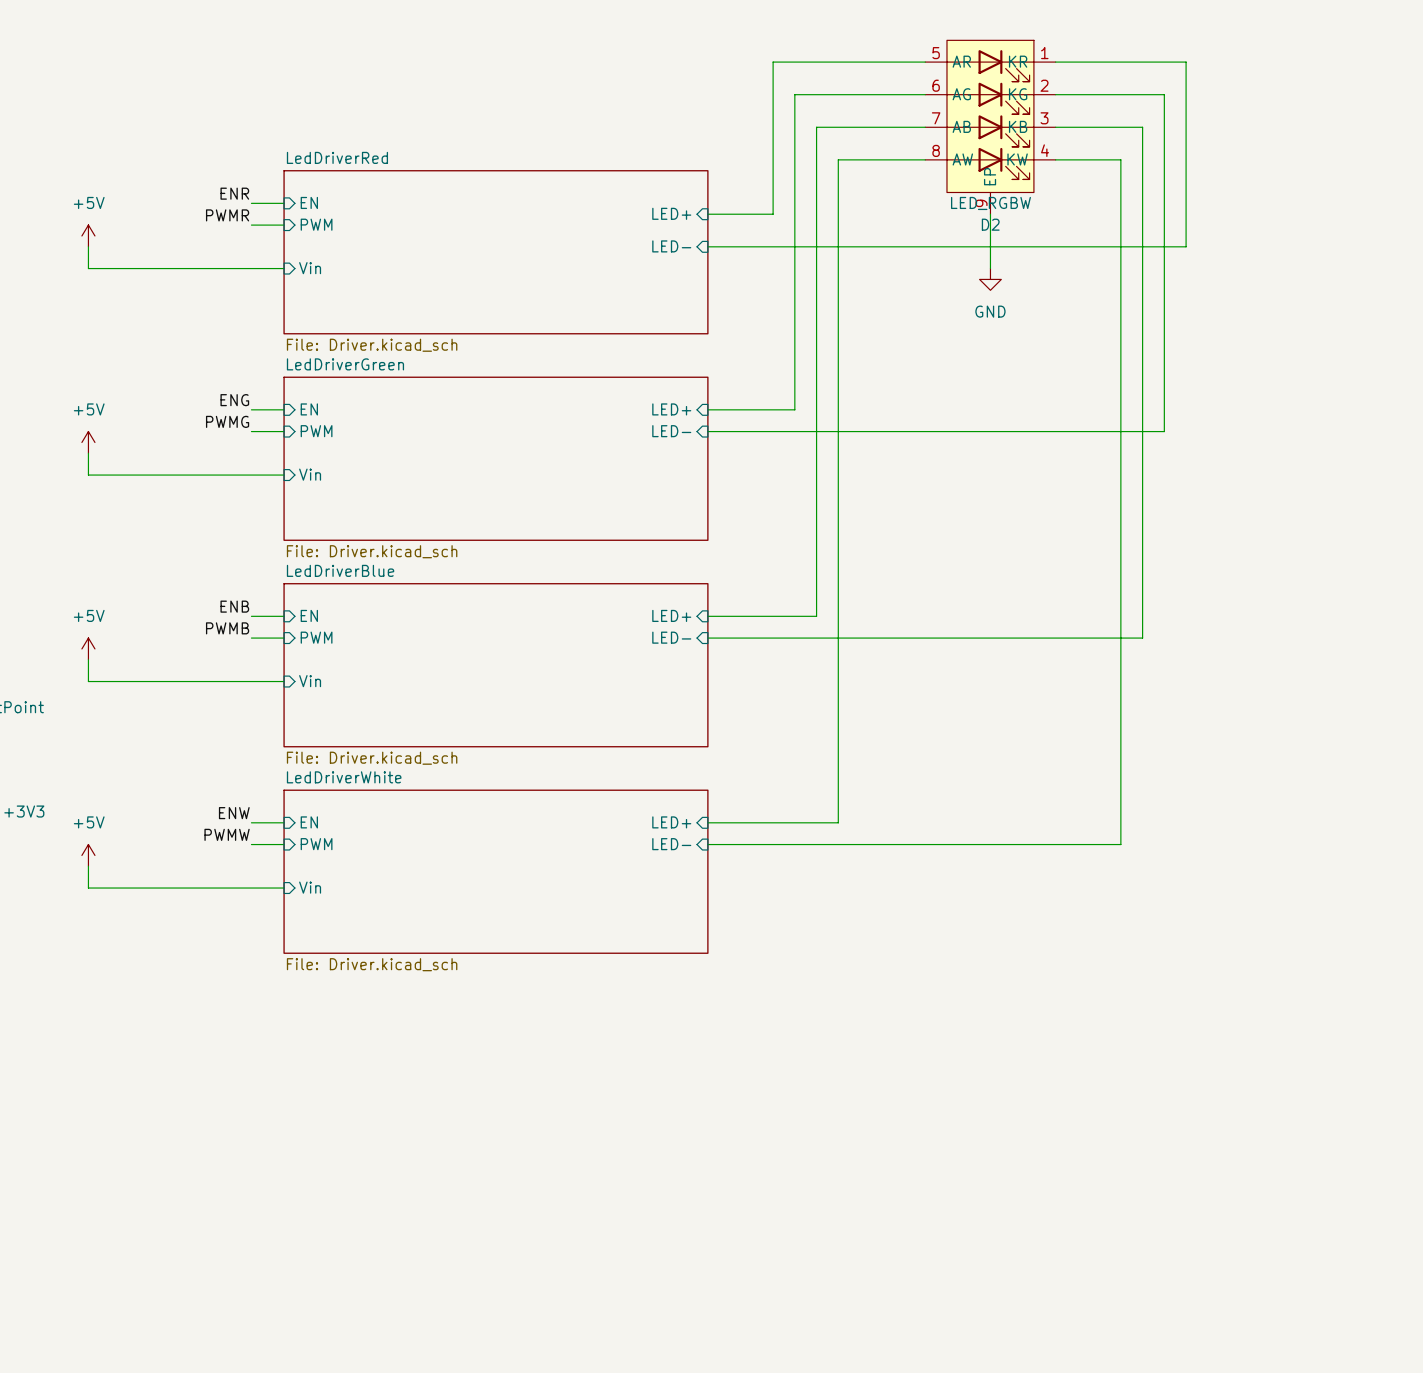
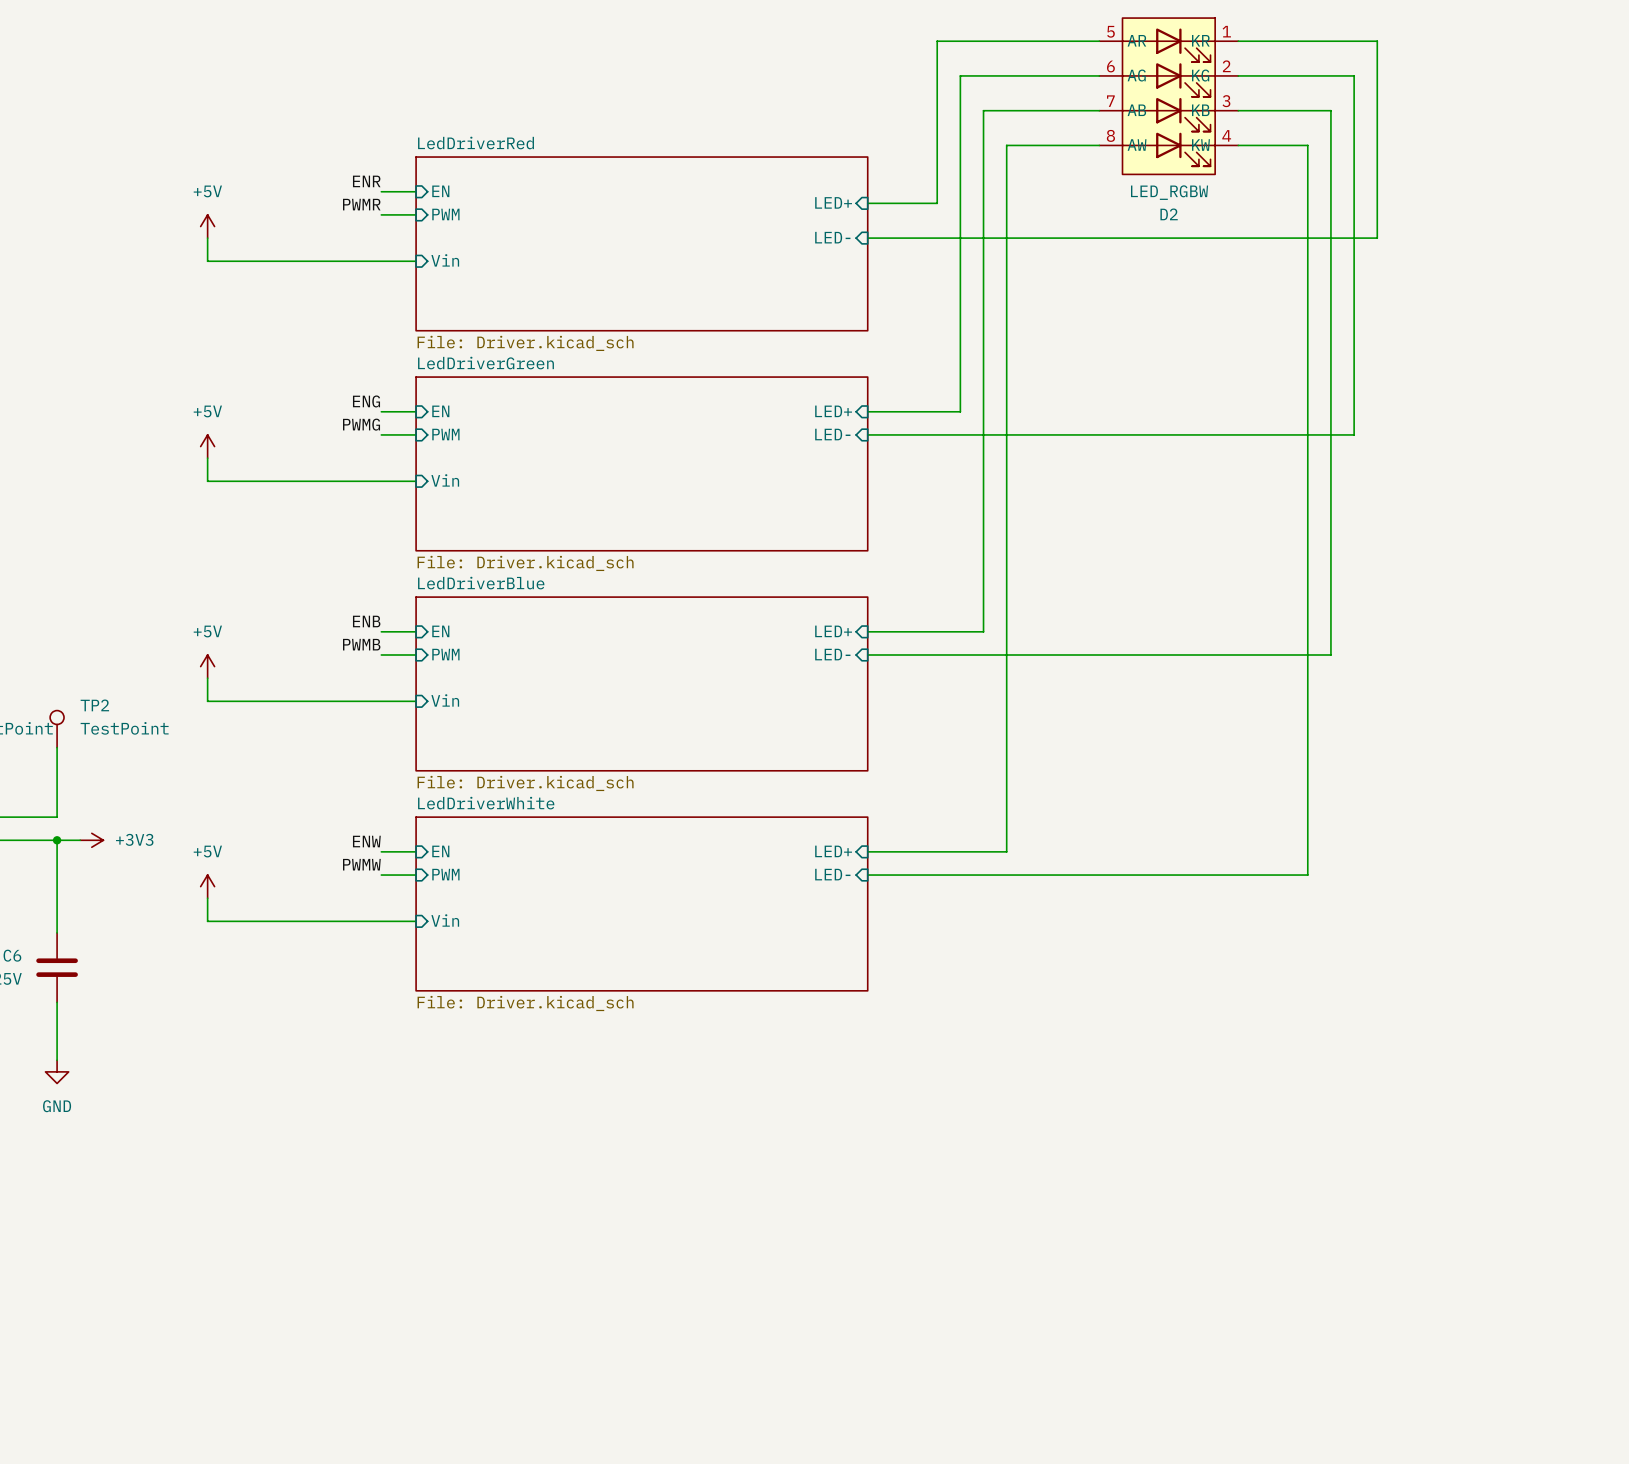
D2 symbol: [925, 40, 1056, 215] -> [1099, 18, 1239, 175]
wire: (990, 214) (990, 268) -> none
power symbol: GND (990, 279) -> none

